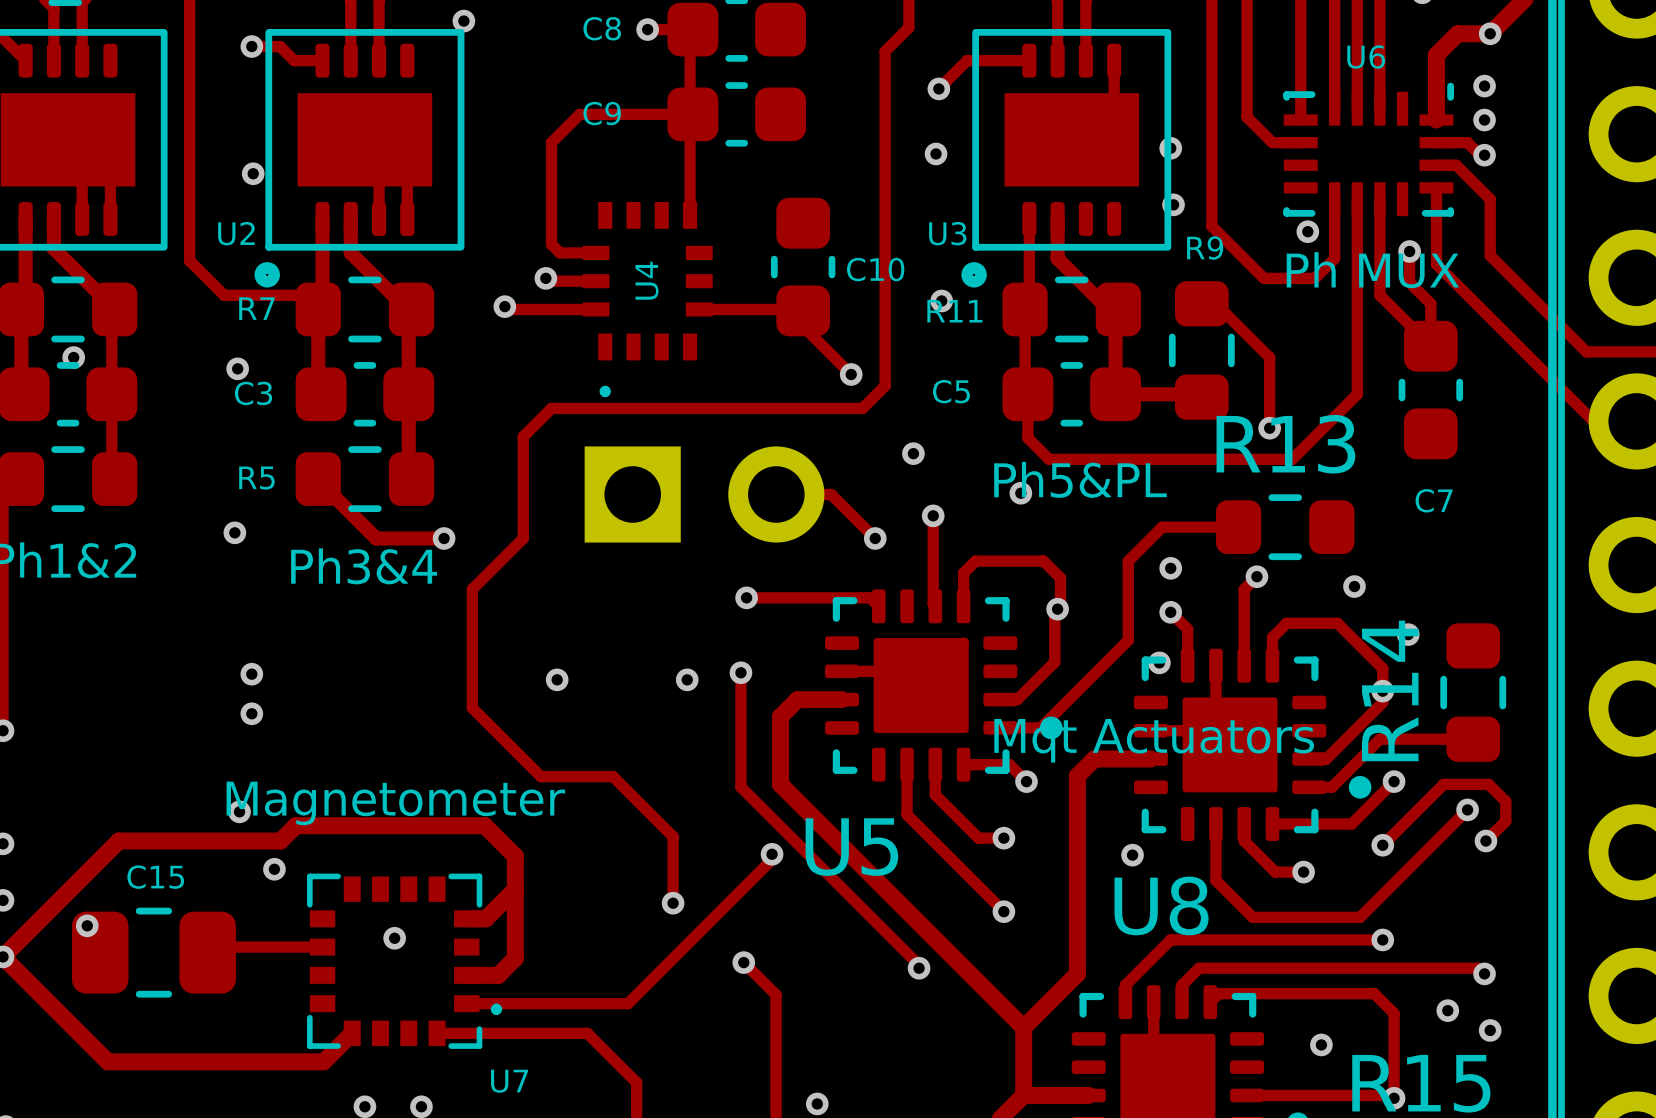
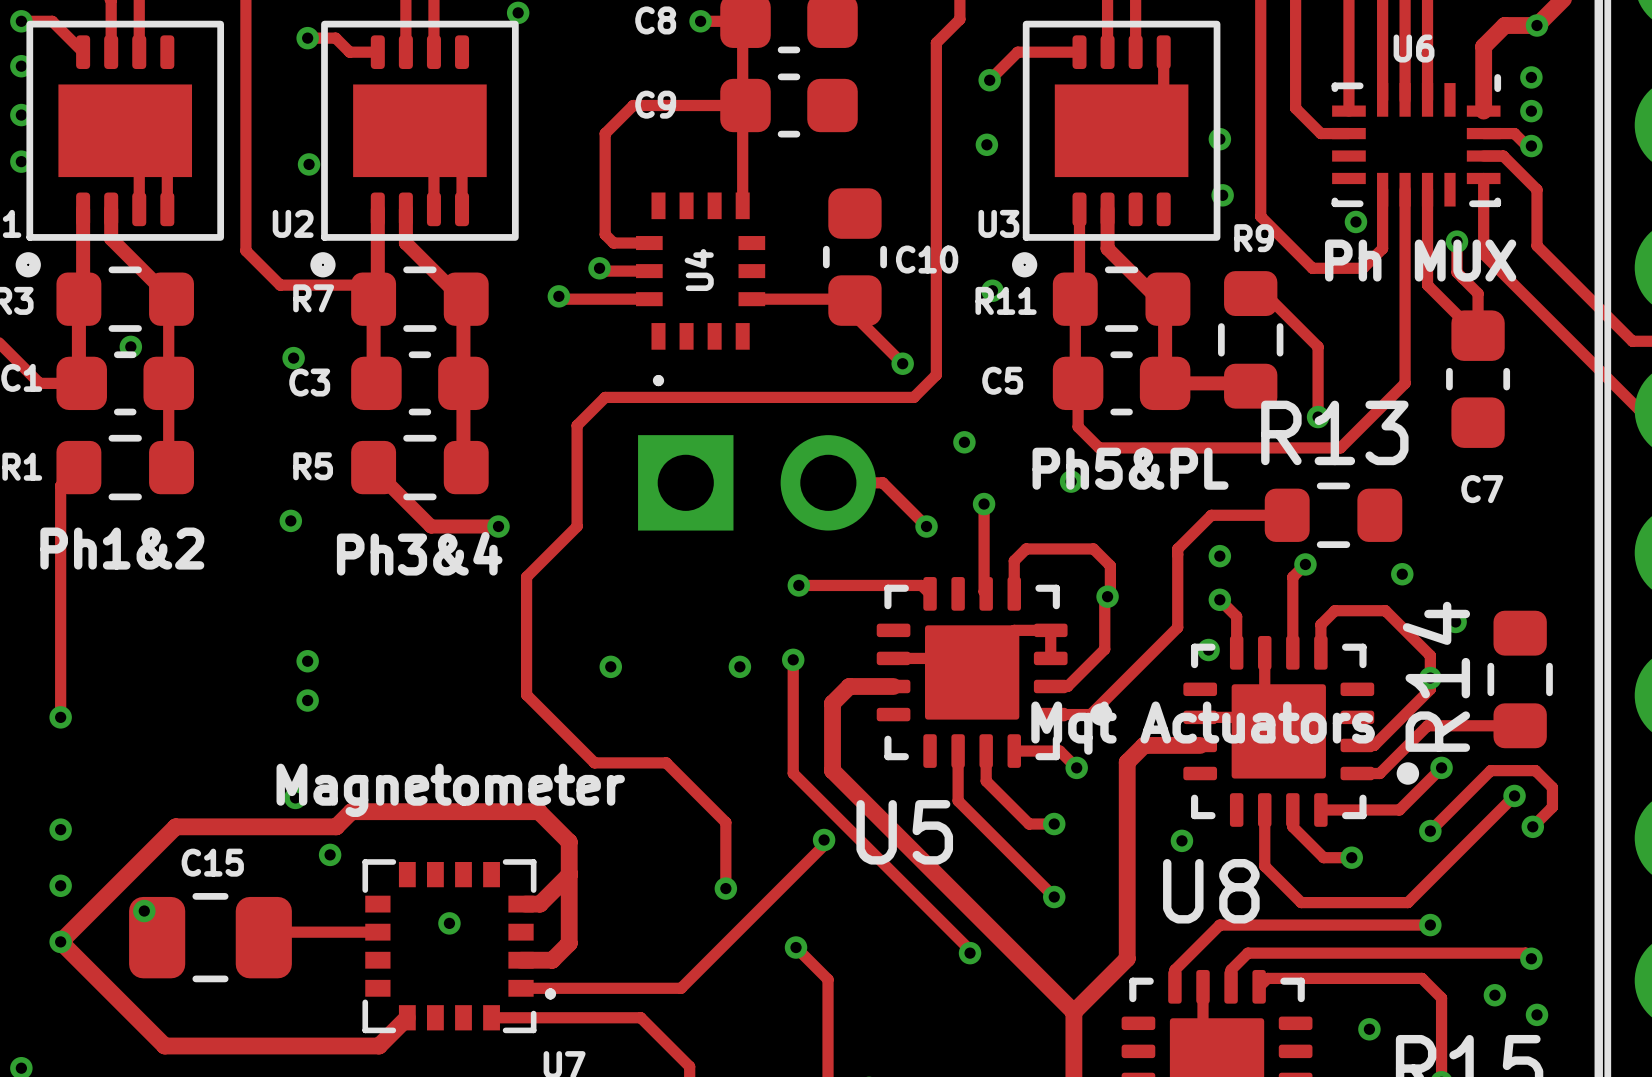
track: none -> (1014, 630) (1050, 630) (1050, 658)

